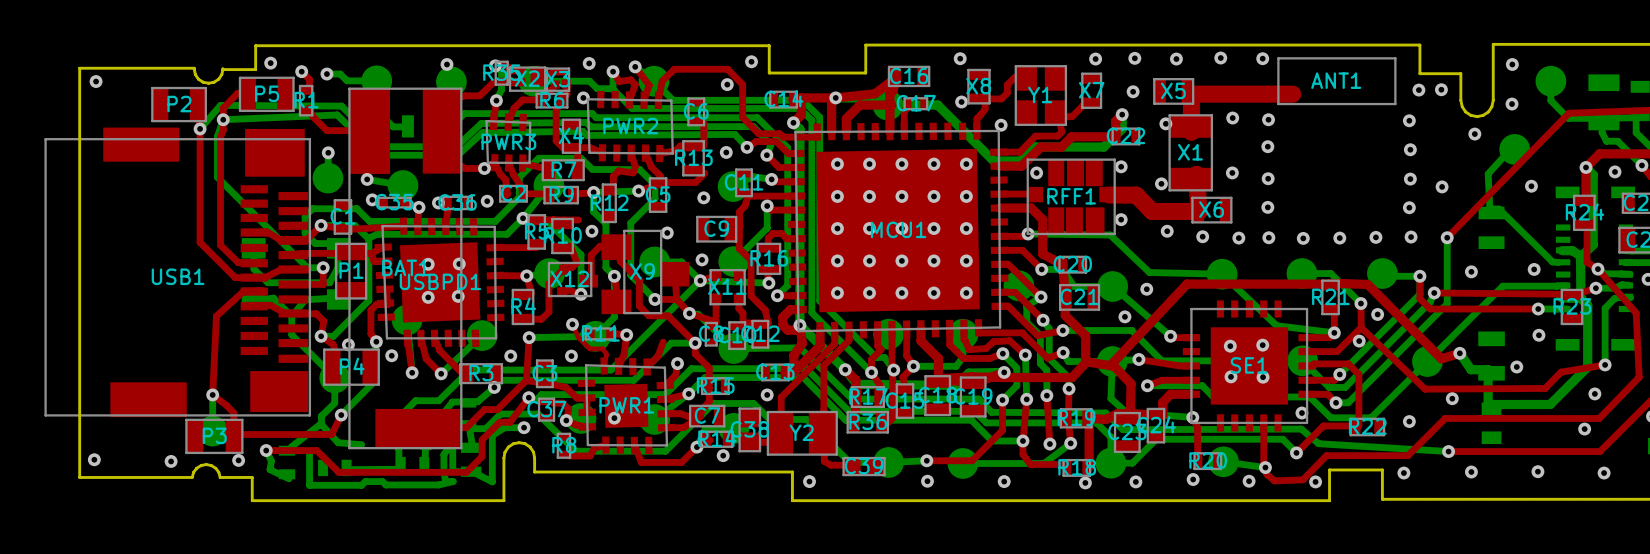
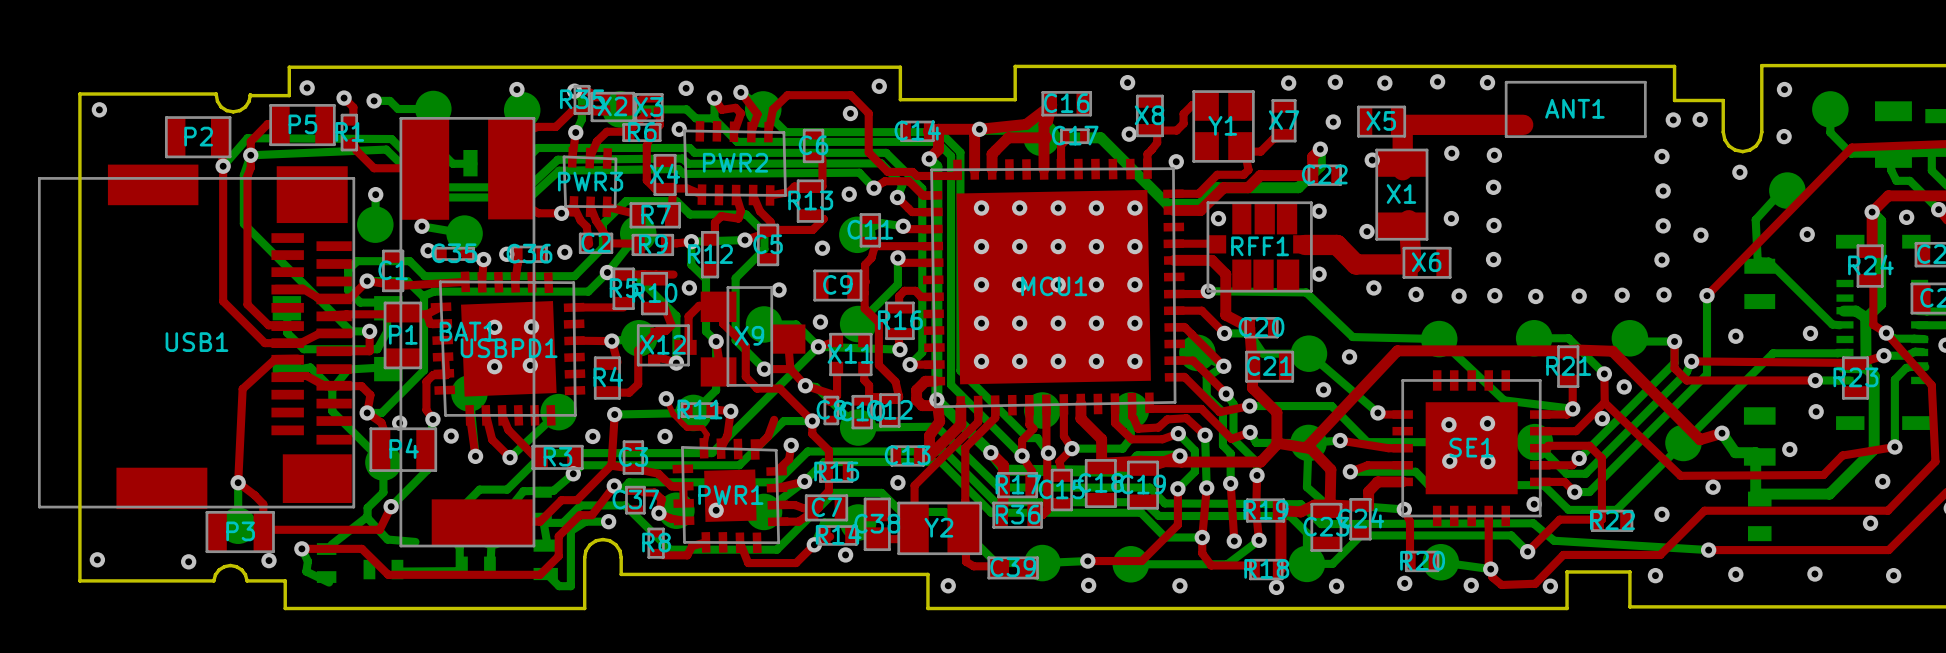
bottom track: (309, 454) (309, 485) (361, 485) (365, 481) (382, 481) (385, 484) (438, 484) (453, 481) (445, 481) (443, 471) (443, 454) (450, 445) (450, 425) (452, 421) (452, 471) (472, 471) (492, 481) -> (546, 574) (559, 586) (570, 586)

